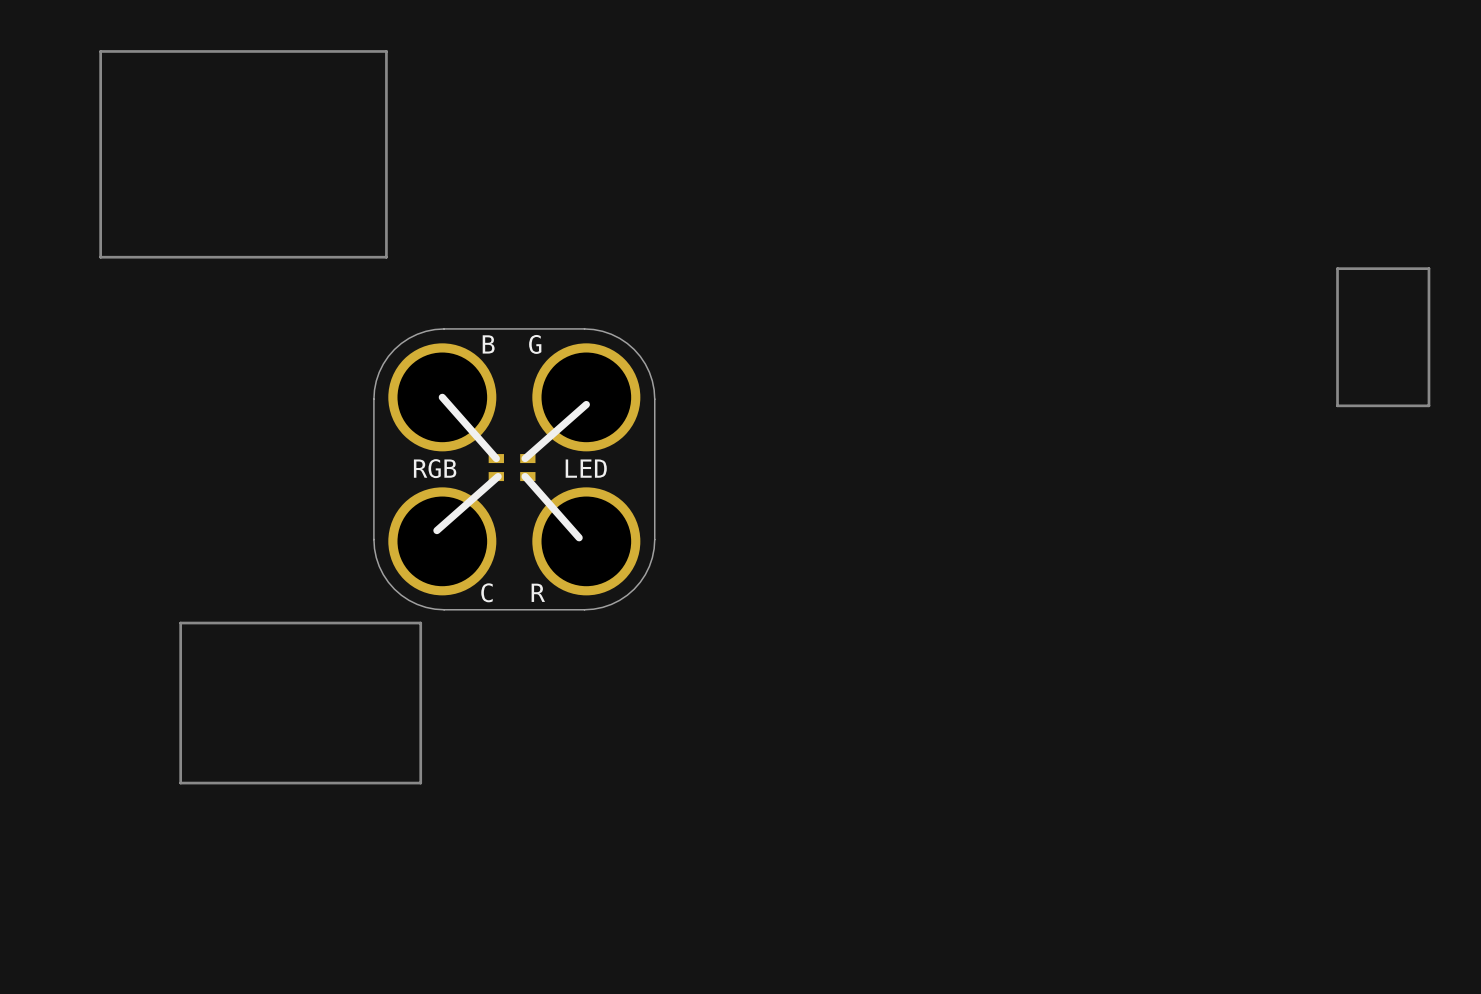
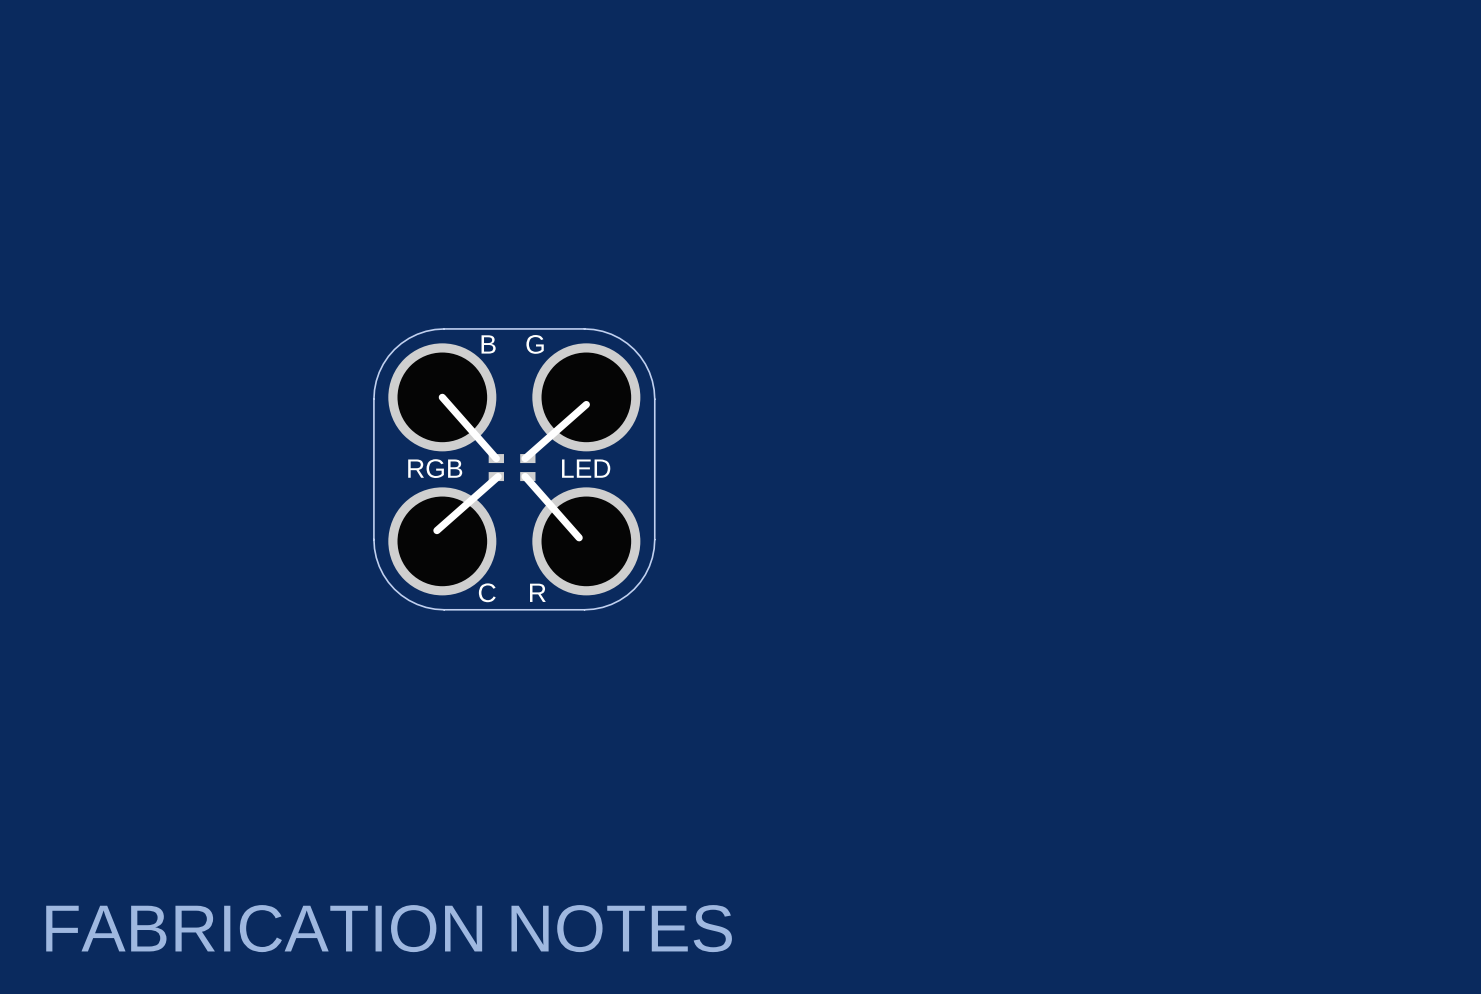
line: (100, 51) (100, 257) (386, 257) (386, 51) (100, 51) -> none
line: (1337, 268) (1337, 405) (1428, 405) (1428, 268) (1337, 268) -> none
line: (180, 623) (180, 783) (420, 783) (420, 623) (180, 623) -> none
text: none -> FABRICATION NOTES (389, 928)

